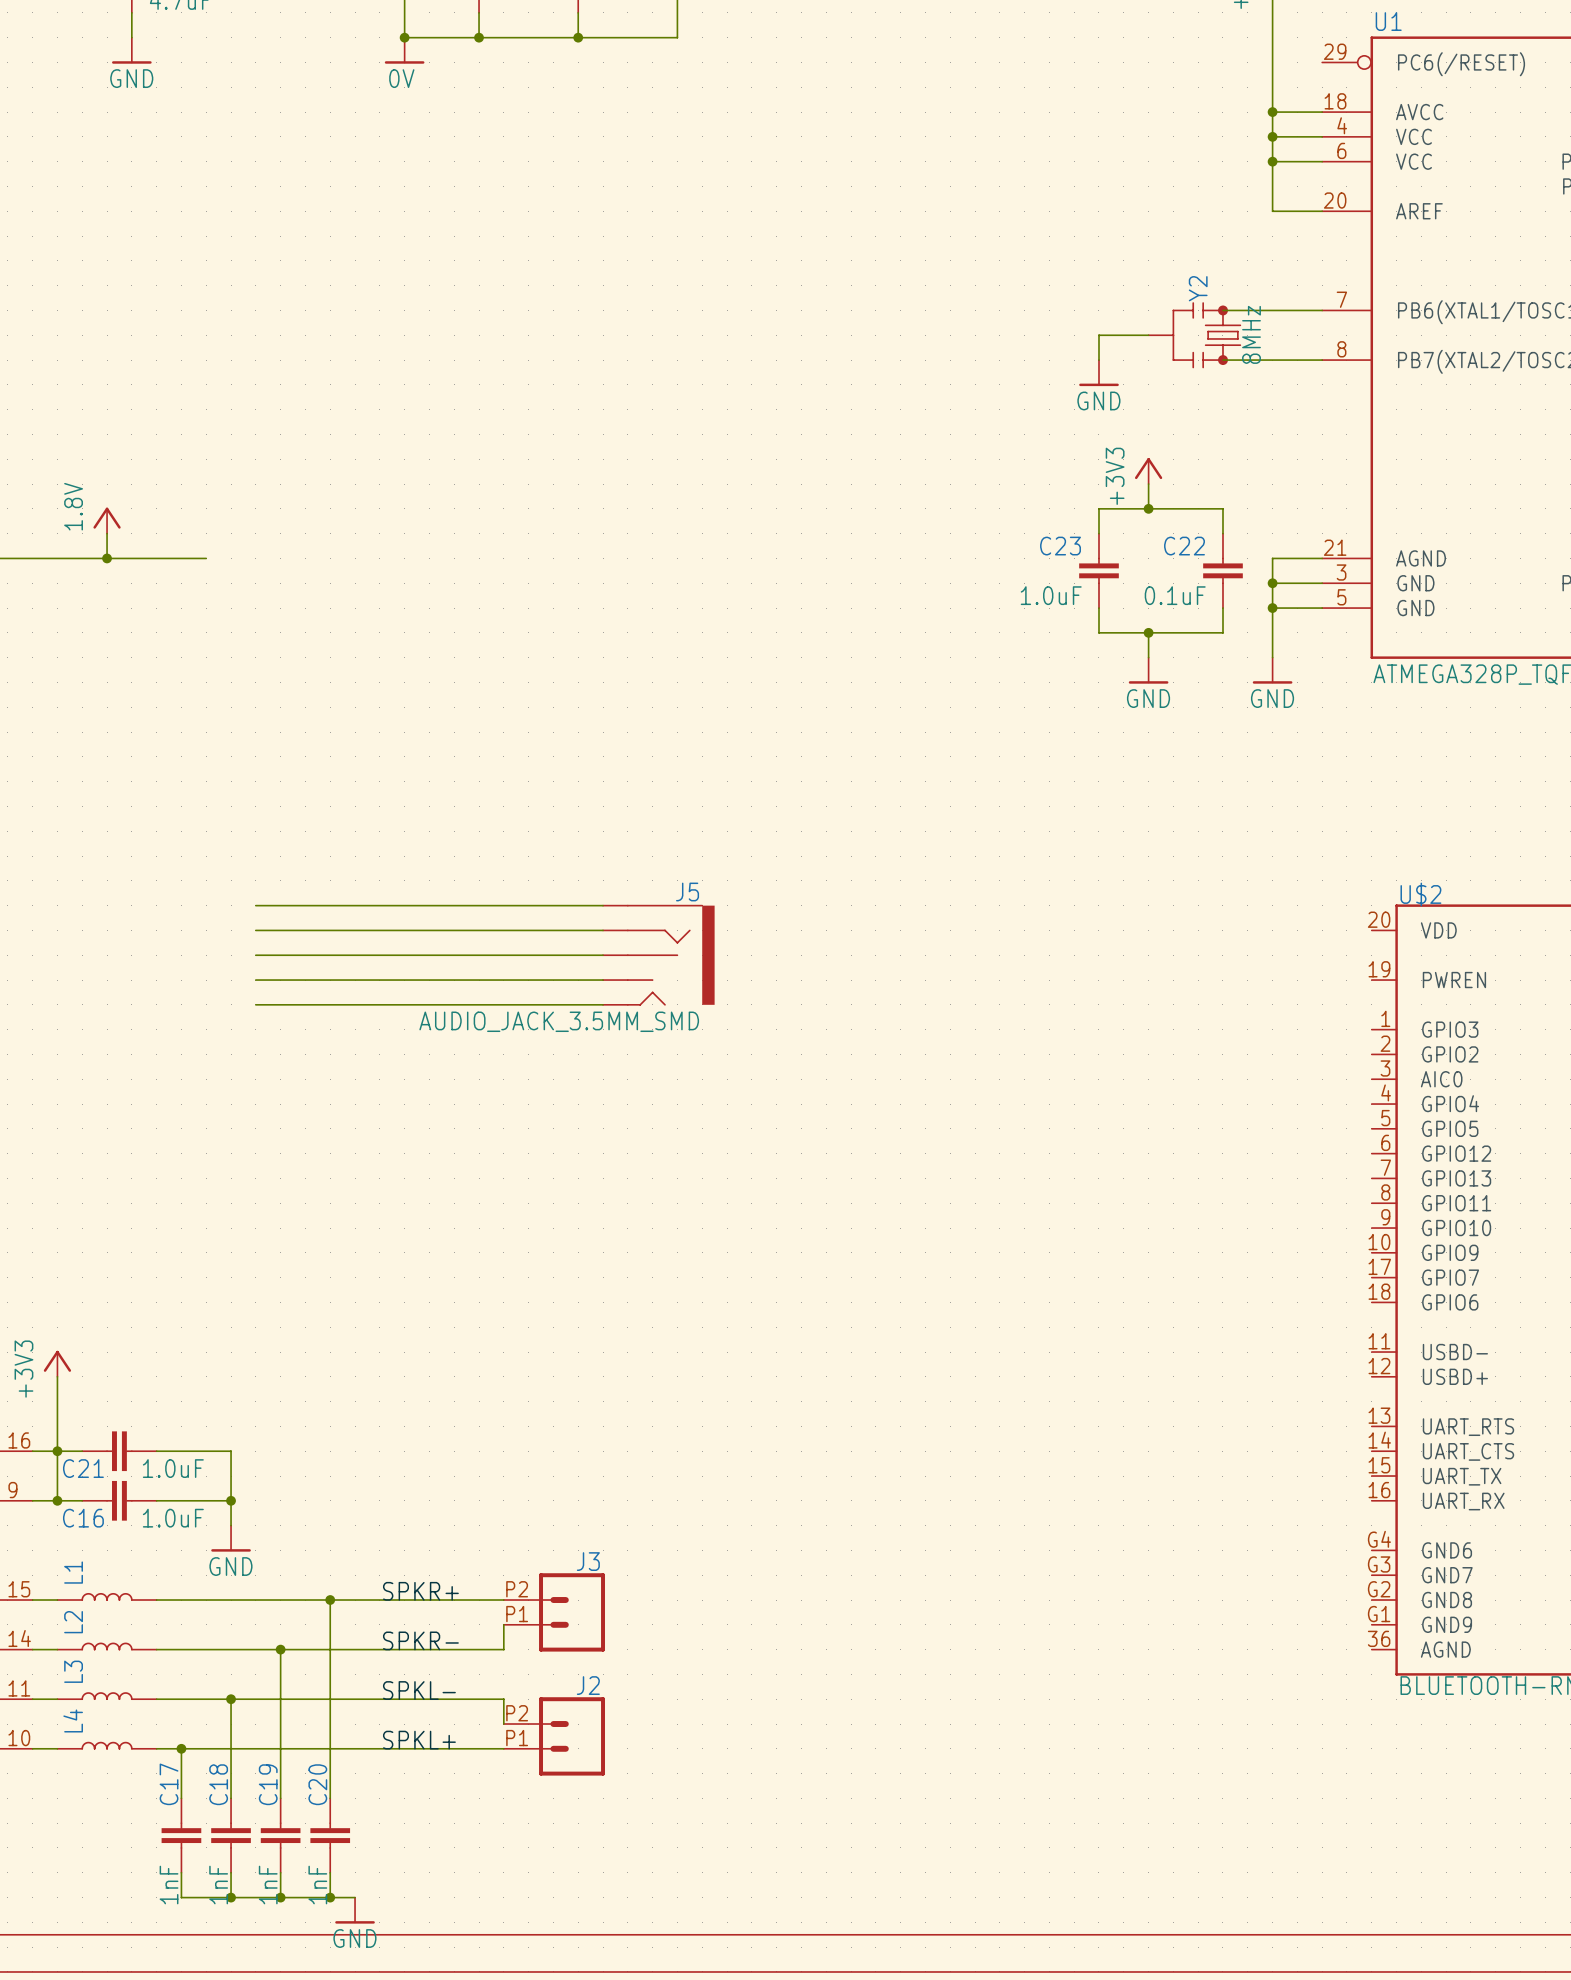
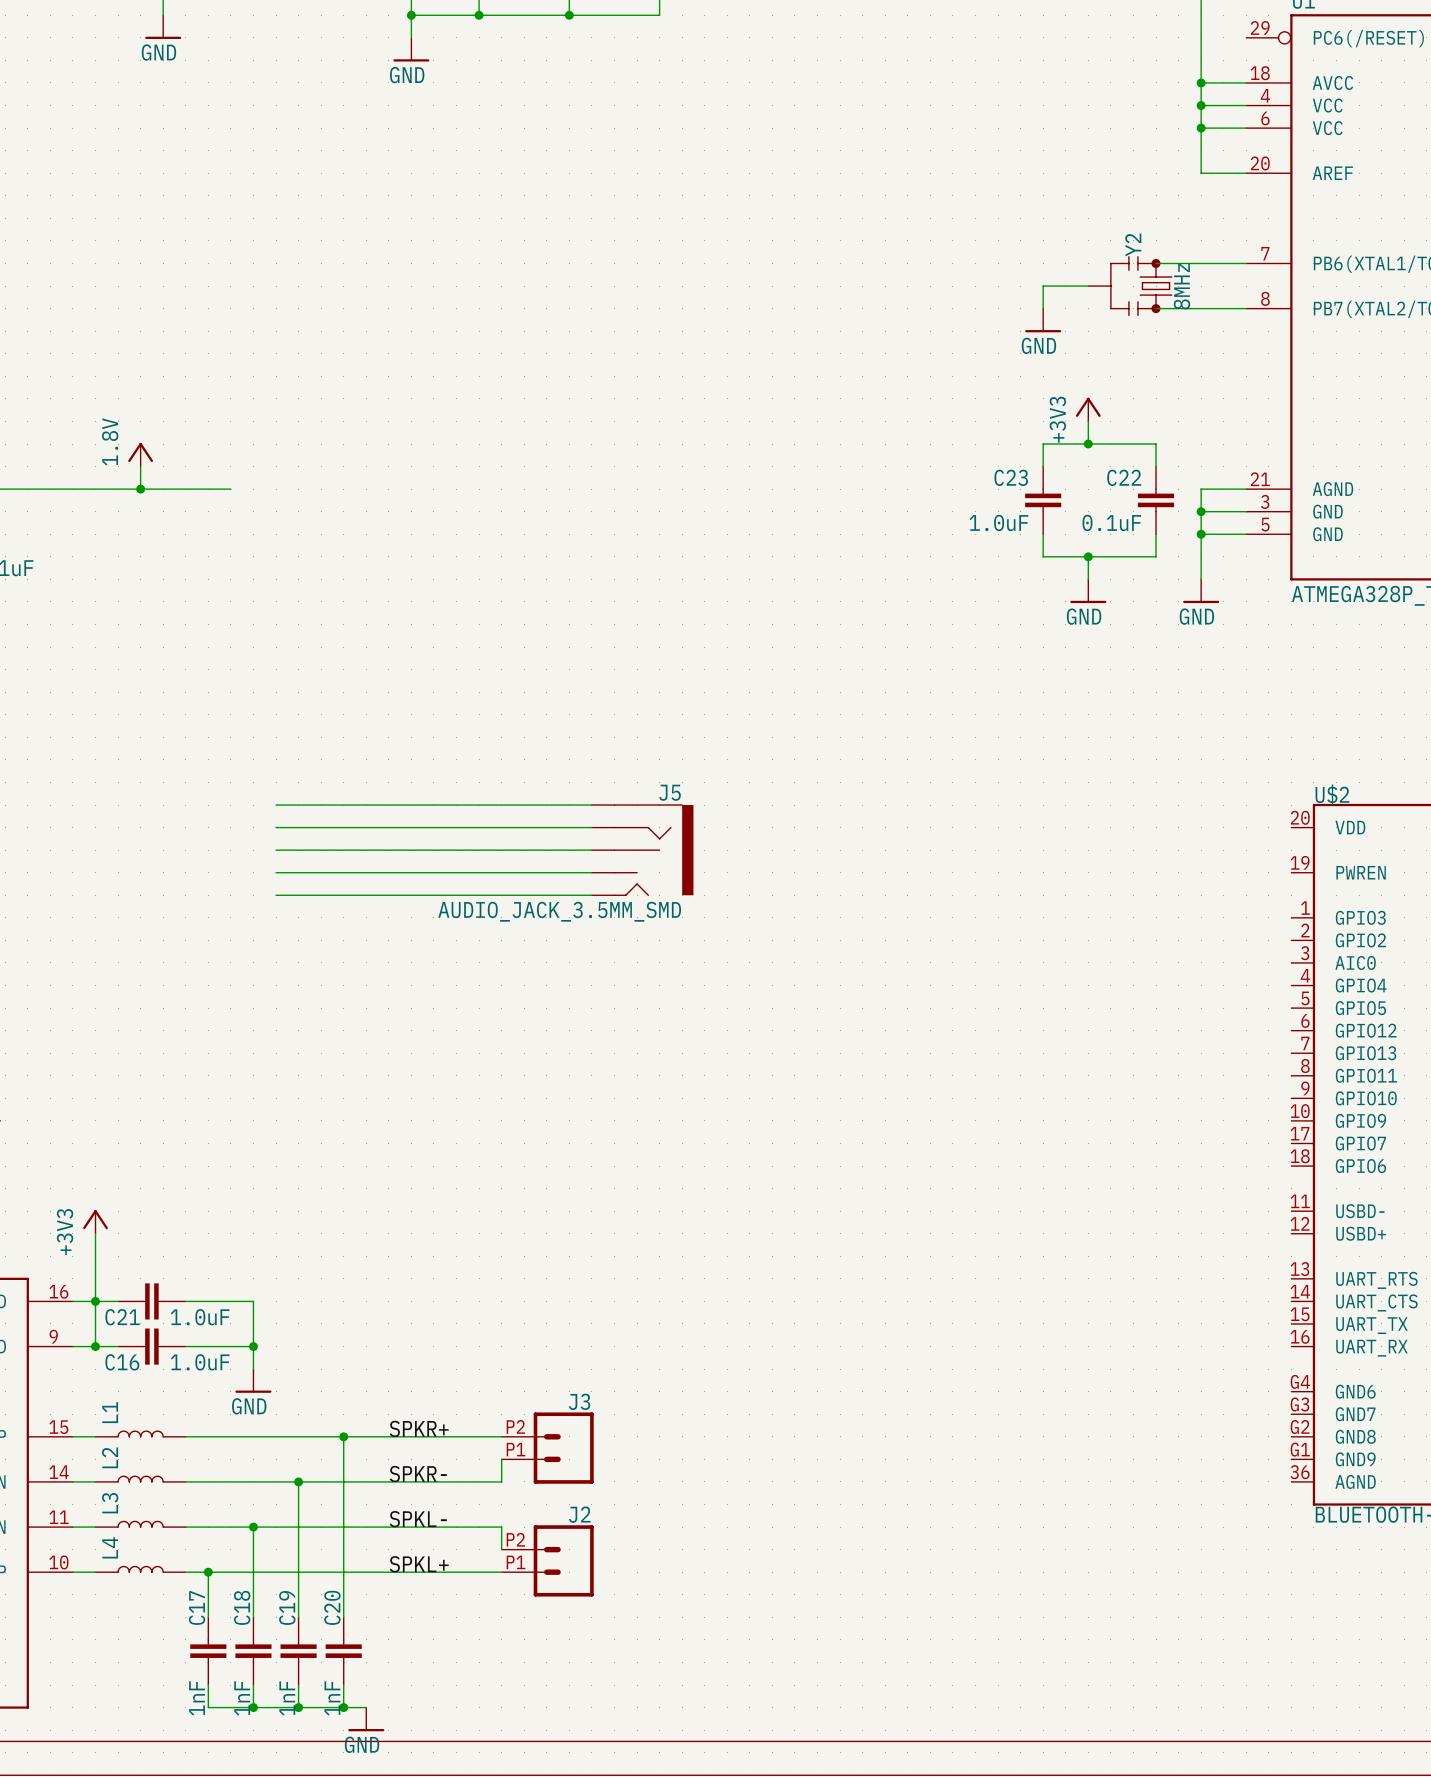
power symbol: 0V (404, 50) -> none
power symbol: none -> GND (411, 49)

